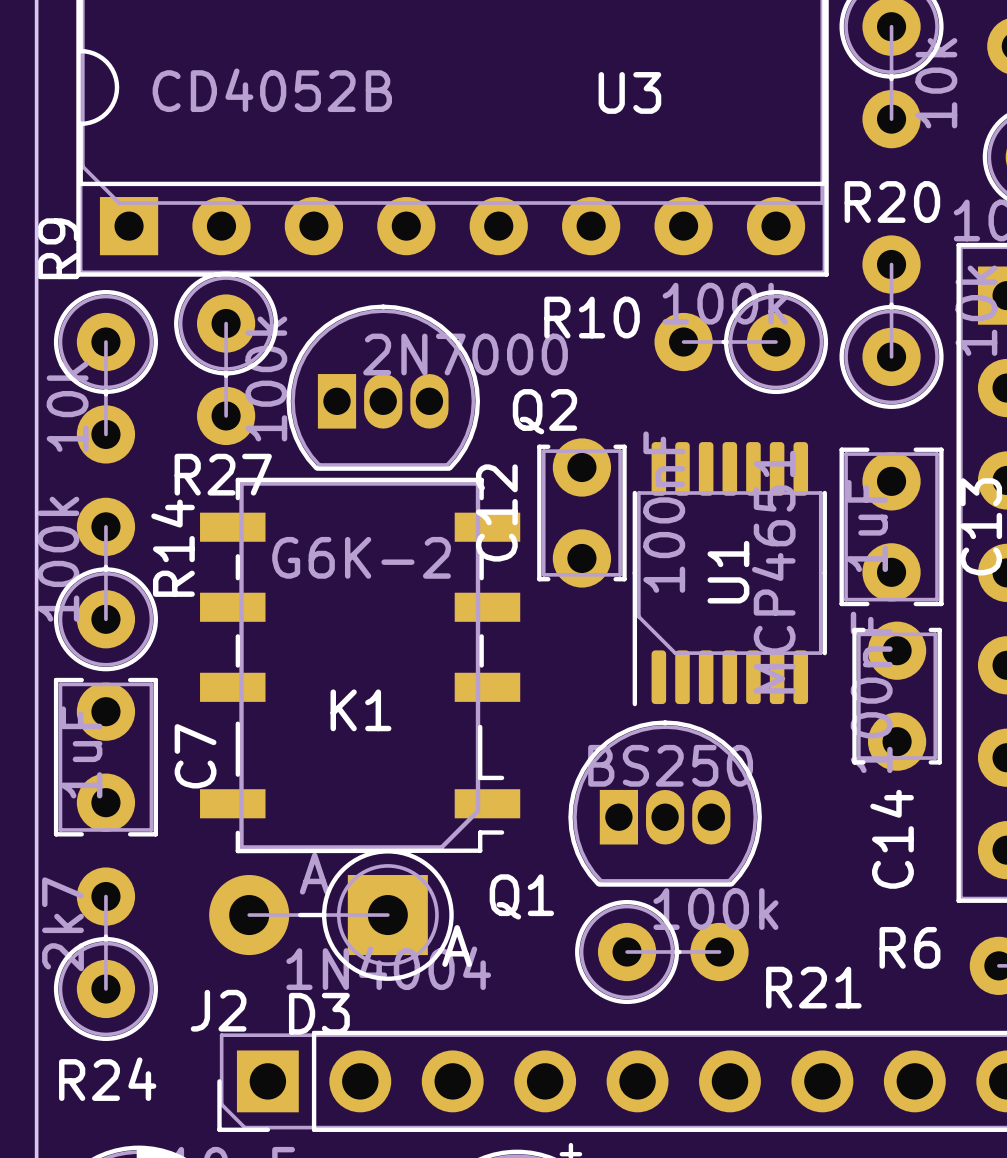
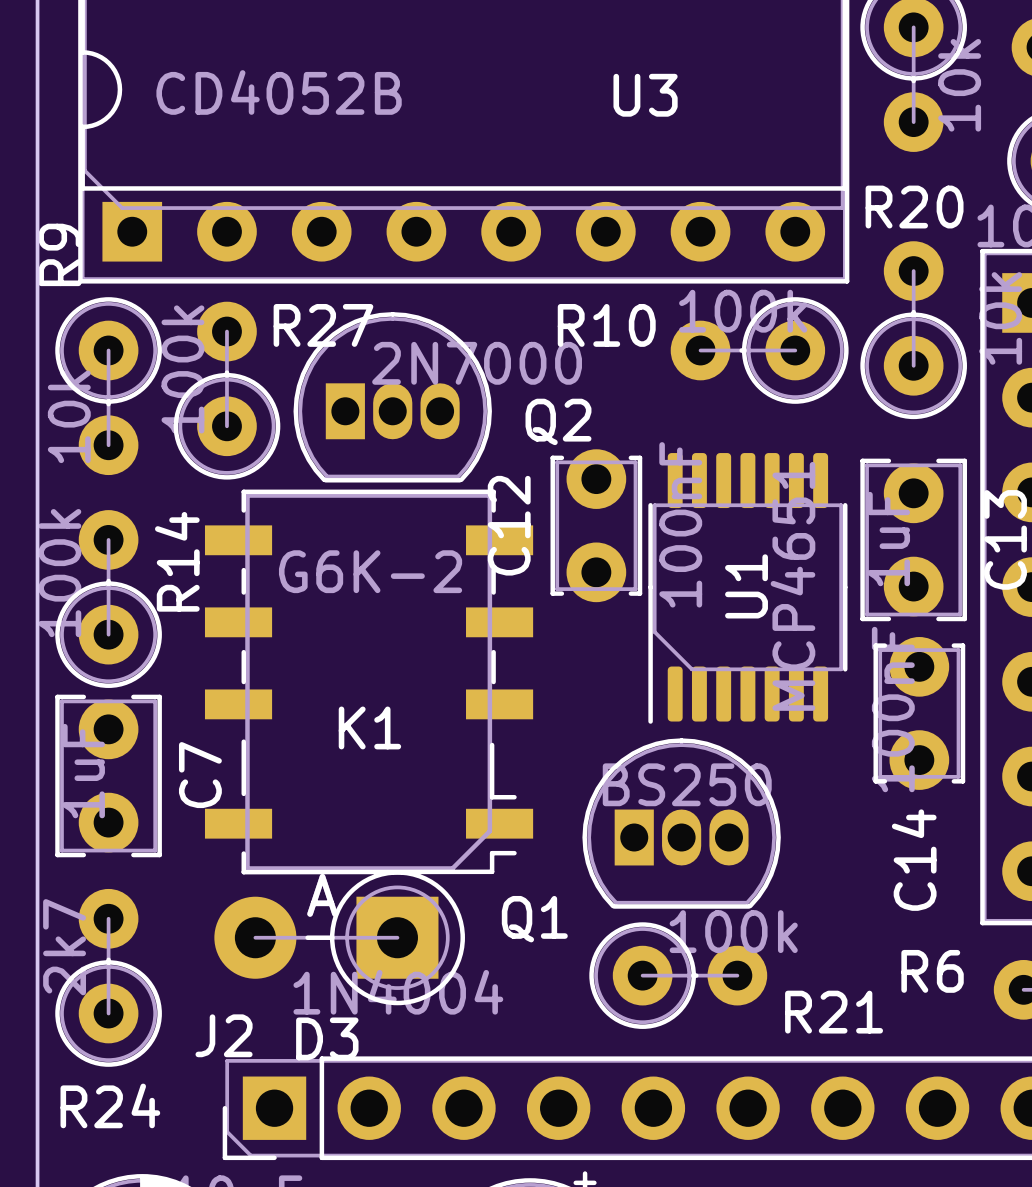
R27 rotation: 0° (226, 358) -> 180° (226, 390)
R27 name position: R27 (223, 474) -> R27 (323, 325)
D3 footprint: [209, 849, 454, 981] -> [214, 870, 465, 1006]

